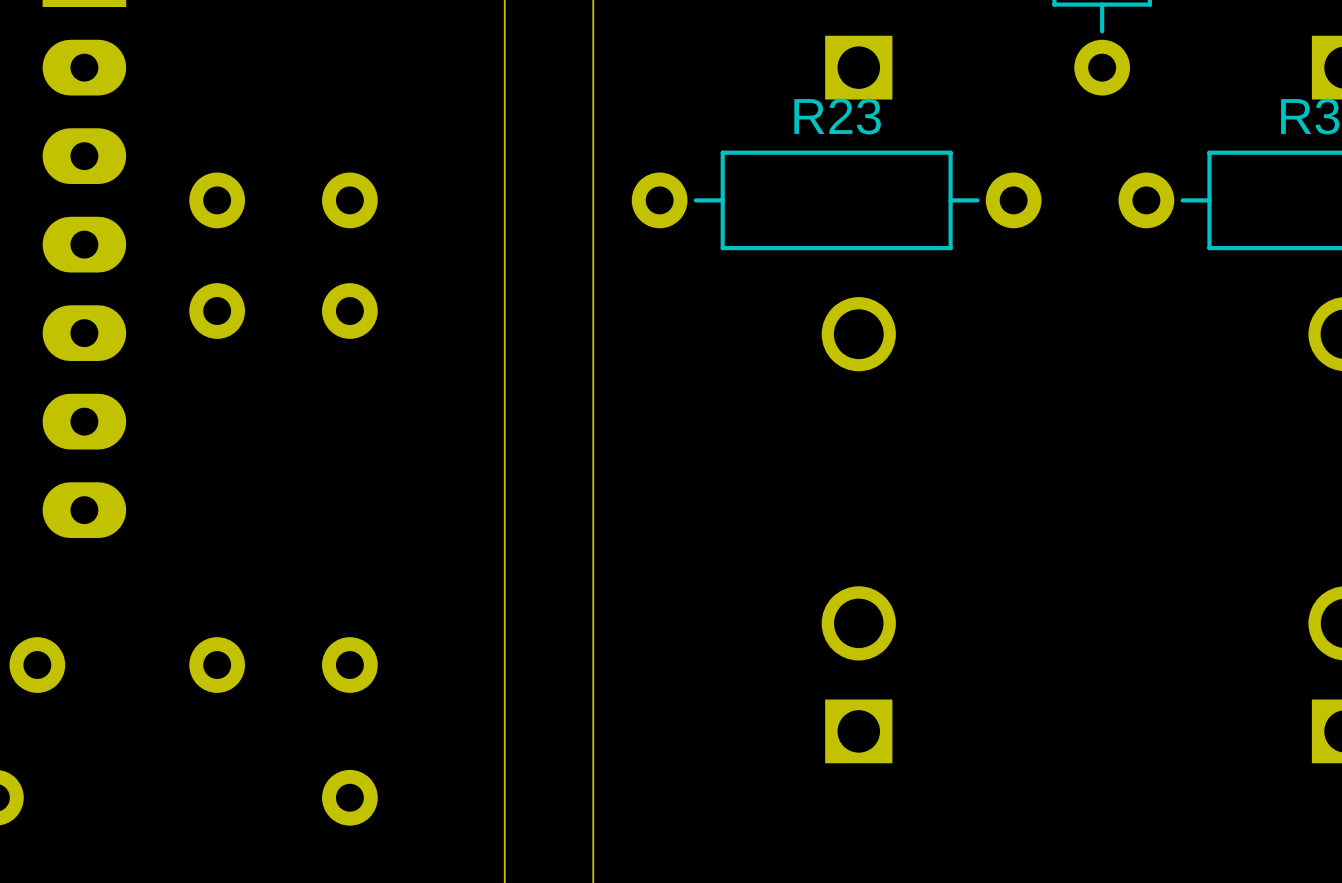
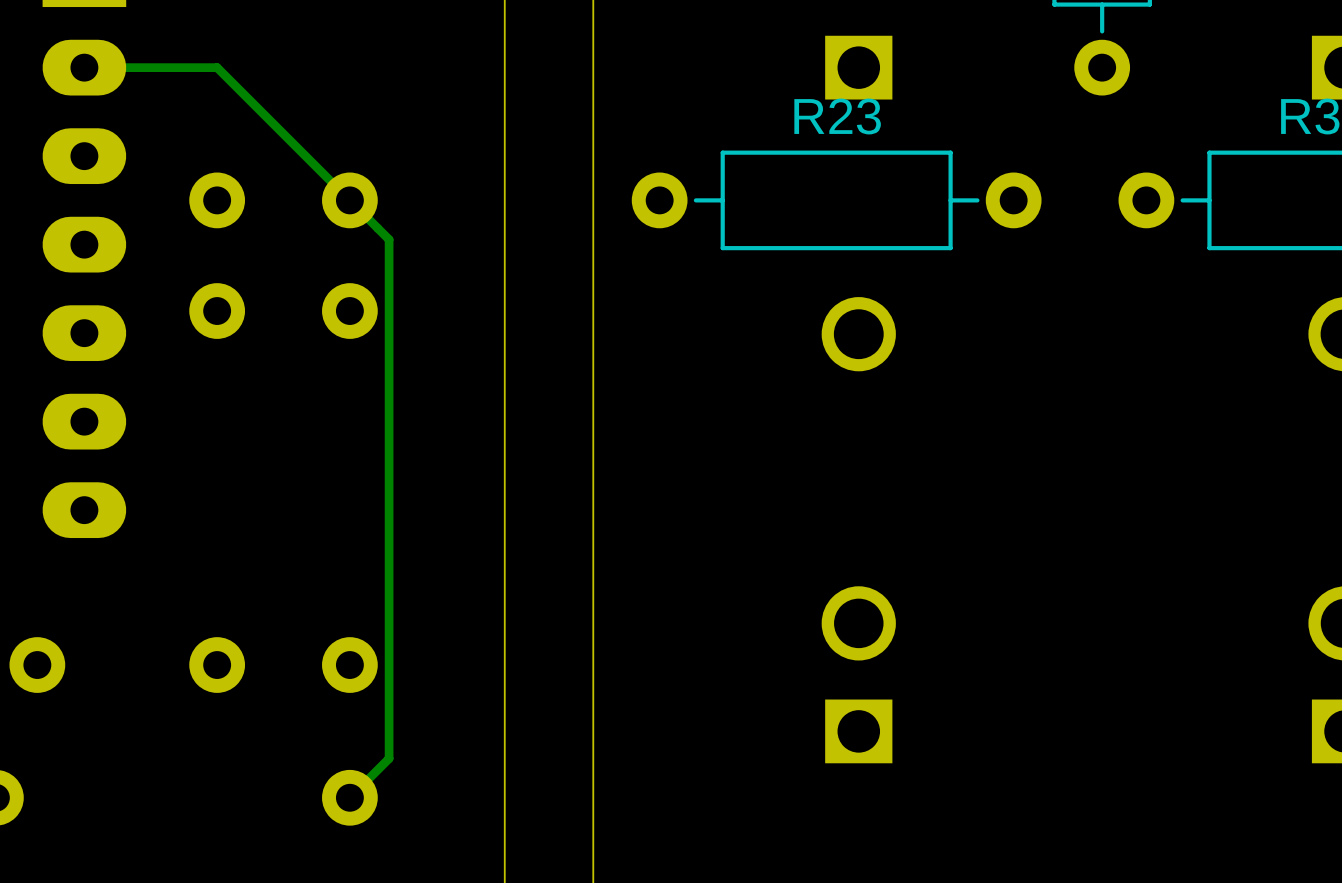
track: none -> (84, 67) (217, 67) (389, 239) (389, 758) (349, 797)

